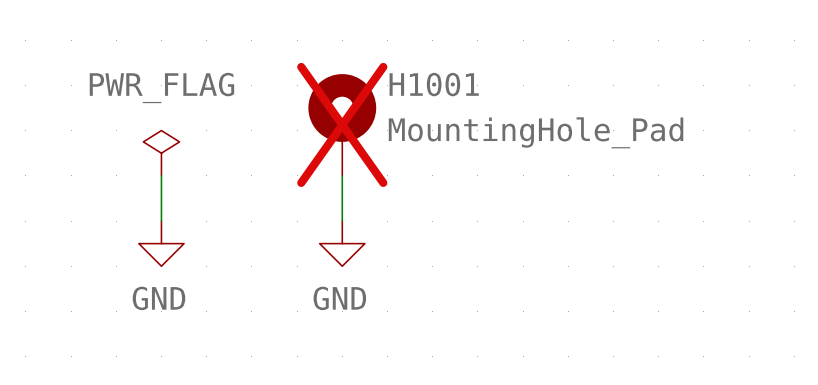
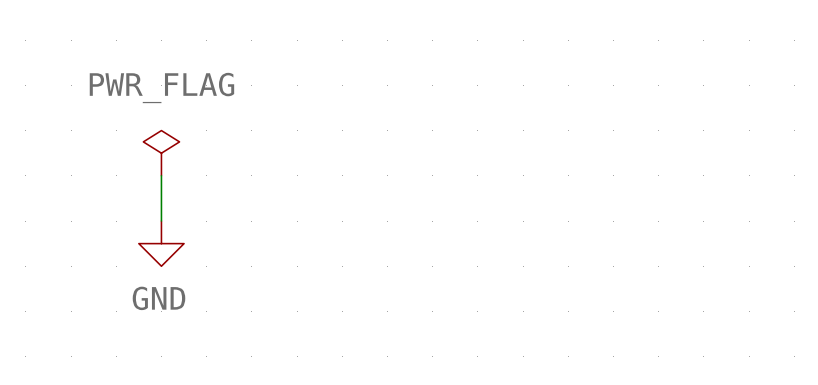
H1001: MountingHole_Pad (342, 124) -> none
wire: (342, 175) (342, 221) -> none
power symbol: GND (342, 243) -> none

